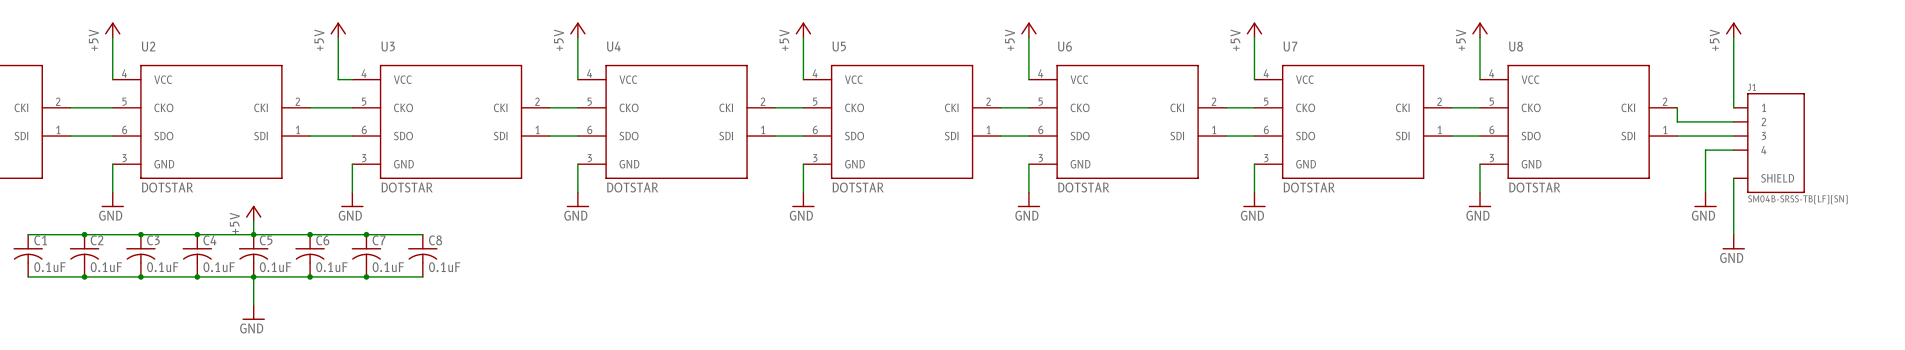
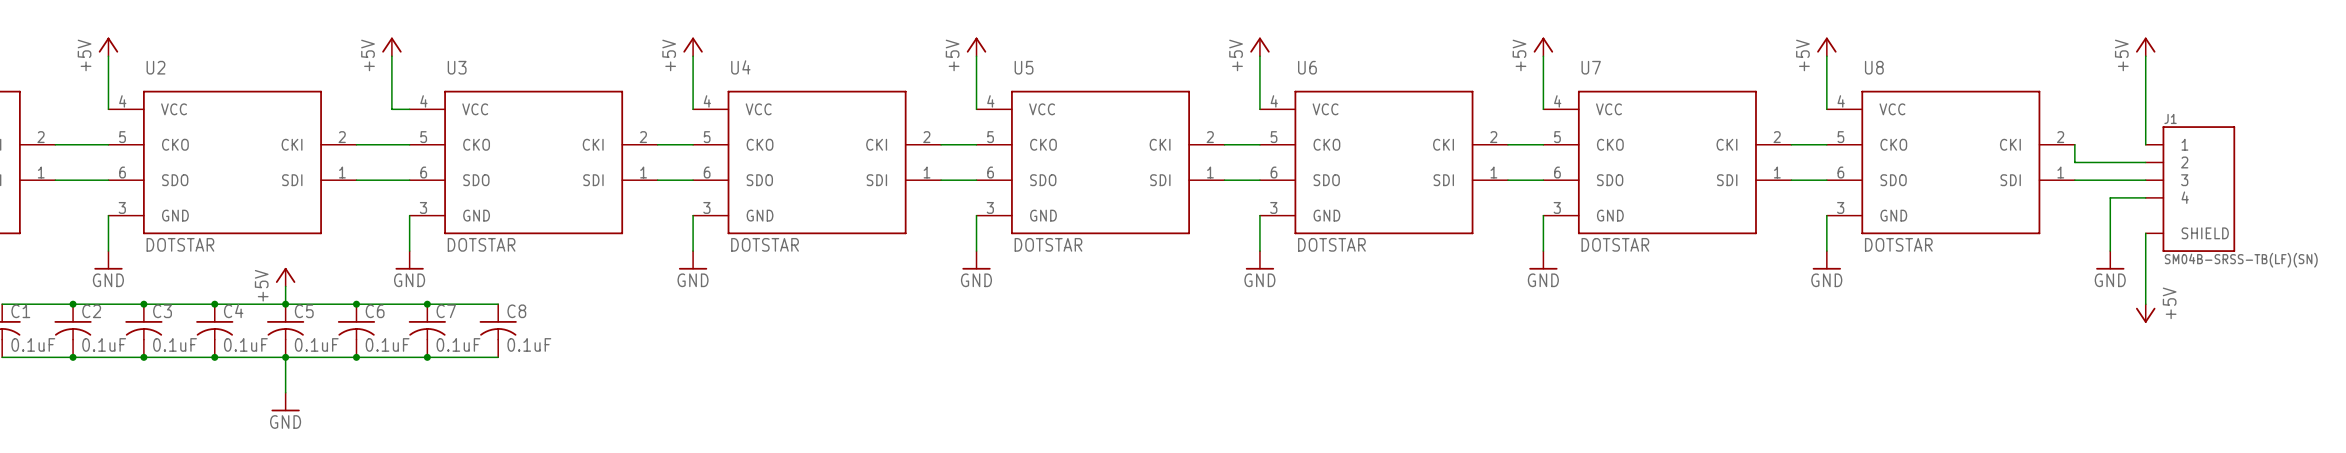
power symbol: GND (1733, 242) -> +5V (2145, 313)

